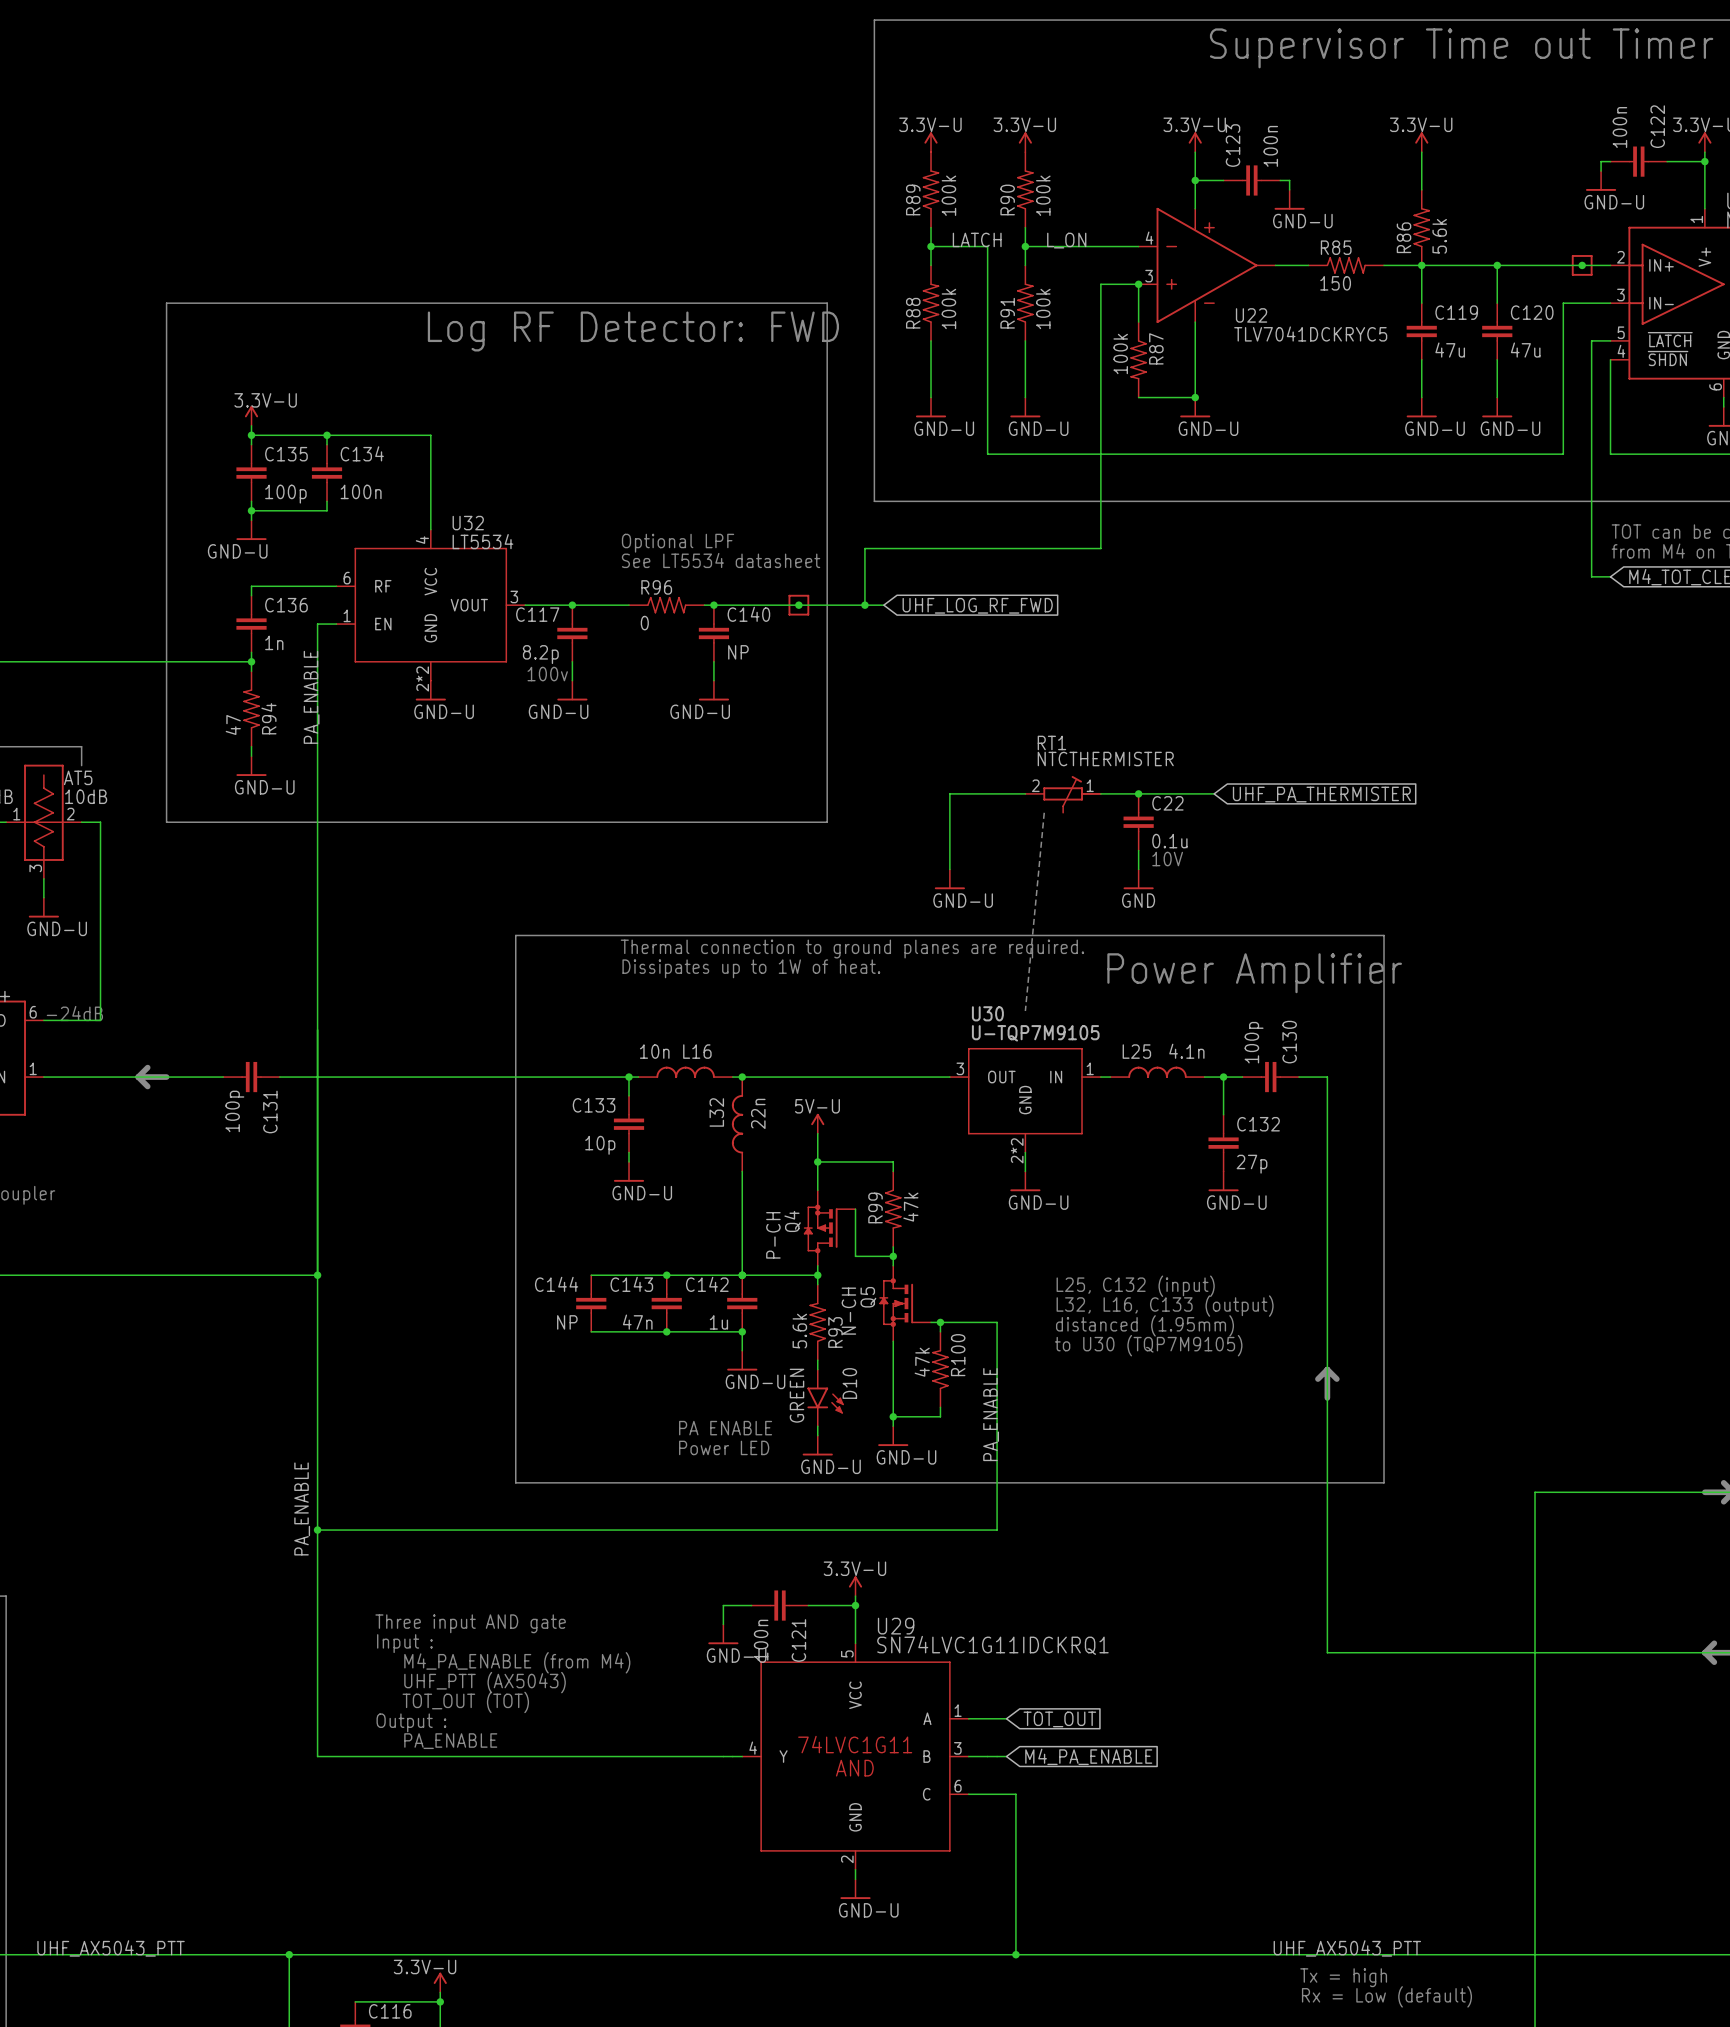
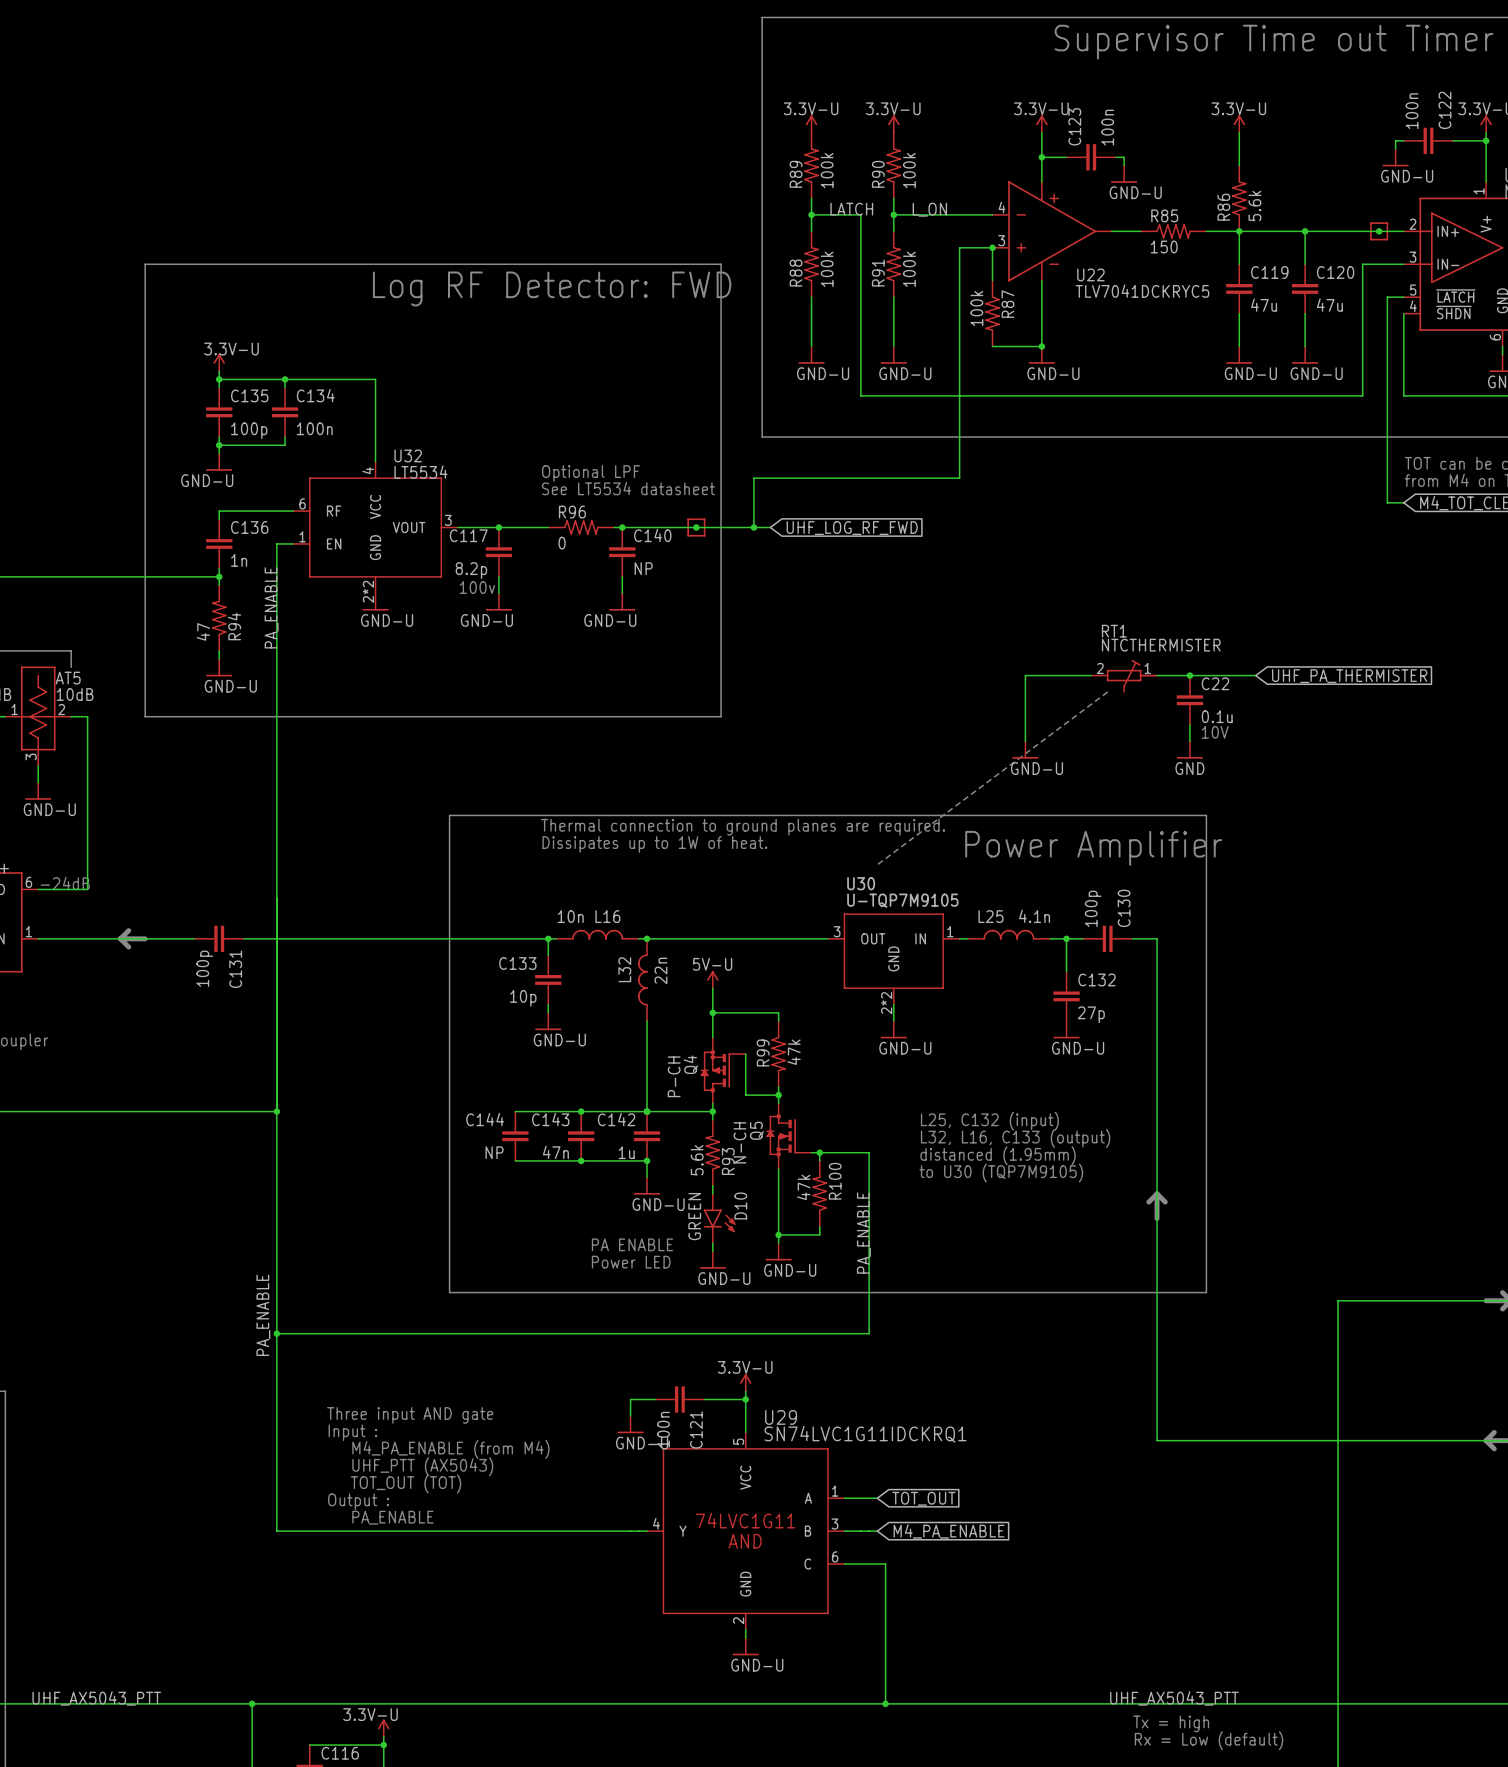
wire: none -> (1091, 675) (1025, 675) (1025, 741)
wire: none -> (1157, 675) (1255, 675)
junction: none -> (1189, 675)
global label: none -> UHF_PA_THERMISTER (1349, 676)
wire: (1025, 793) (949, 793) (949, 869) -> none
wire: (1100, 793) (1214, 793) -> none
junction: (1138, 793) -> none
line: none -> (1107, 692) (877, 864)
RT1 position: (1063, 794) -> (1124, 676)
global label: UHF_PA_THERMISTER (1321, 794) -> none
line: (1044, 812) (1025, 1010) -> none
C22 position: (1138, 822) -> (1189, 700)
wire: none -> (1189, 724) (1189, 741)
wire: (1138, 850) (1138, 869) -> none
power symbol: none -> GND-U (1025, 750)
power symbol: none -> GND (1189, 750)
power symbol: GND-U (949, 879) -> none
power symbol: GND (1138, 879) -> none

